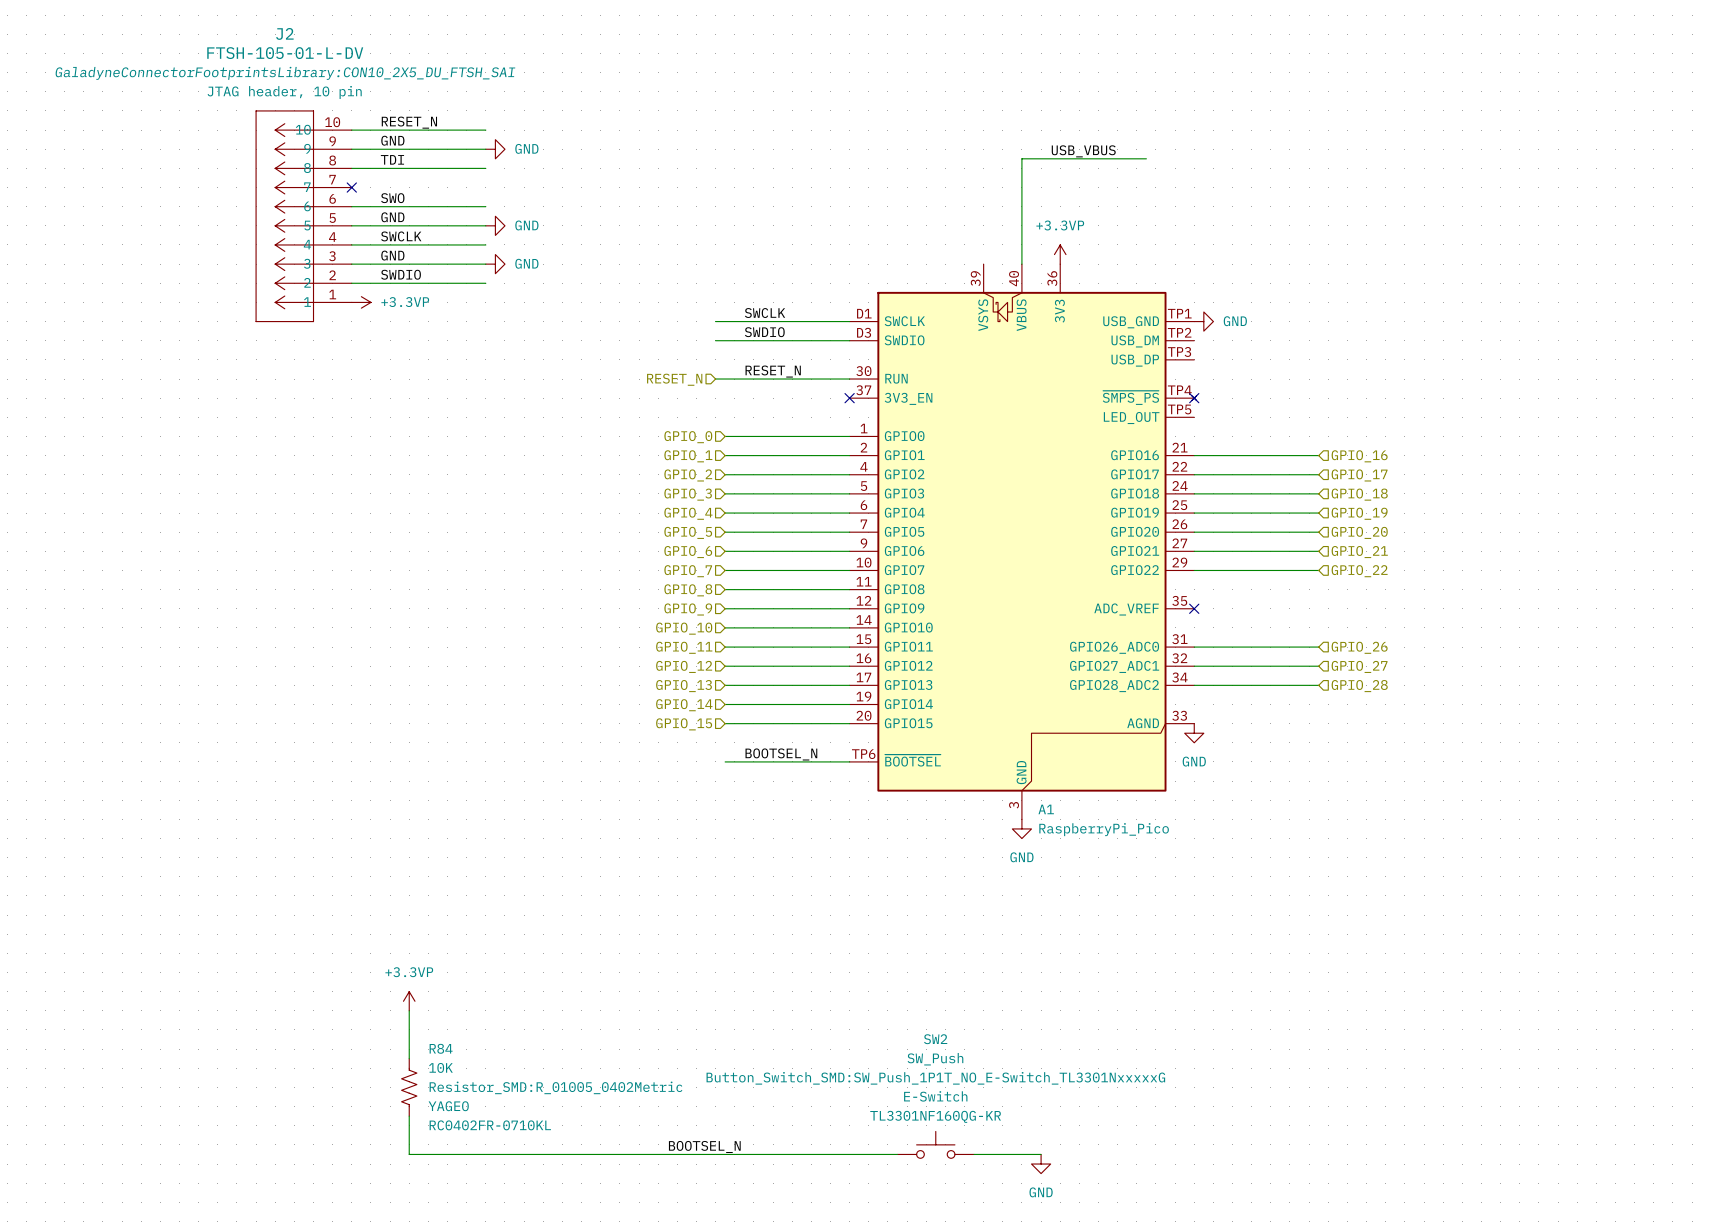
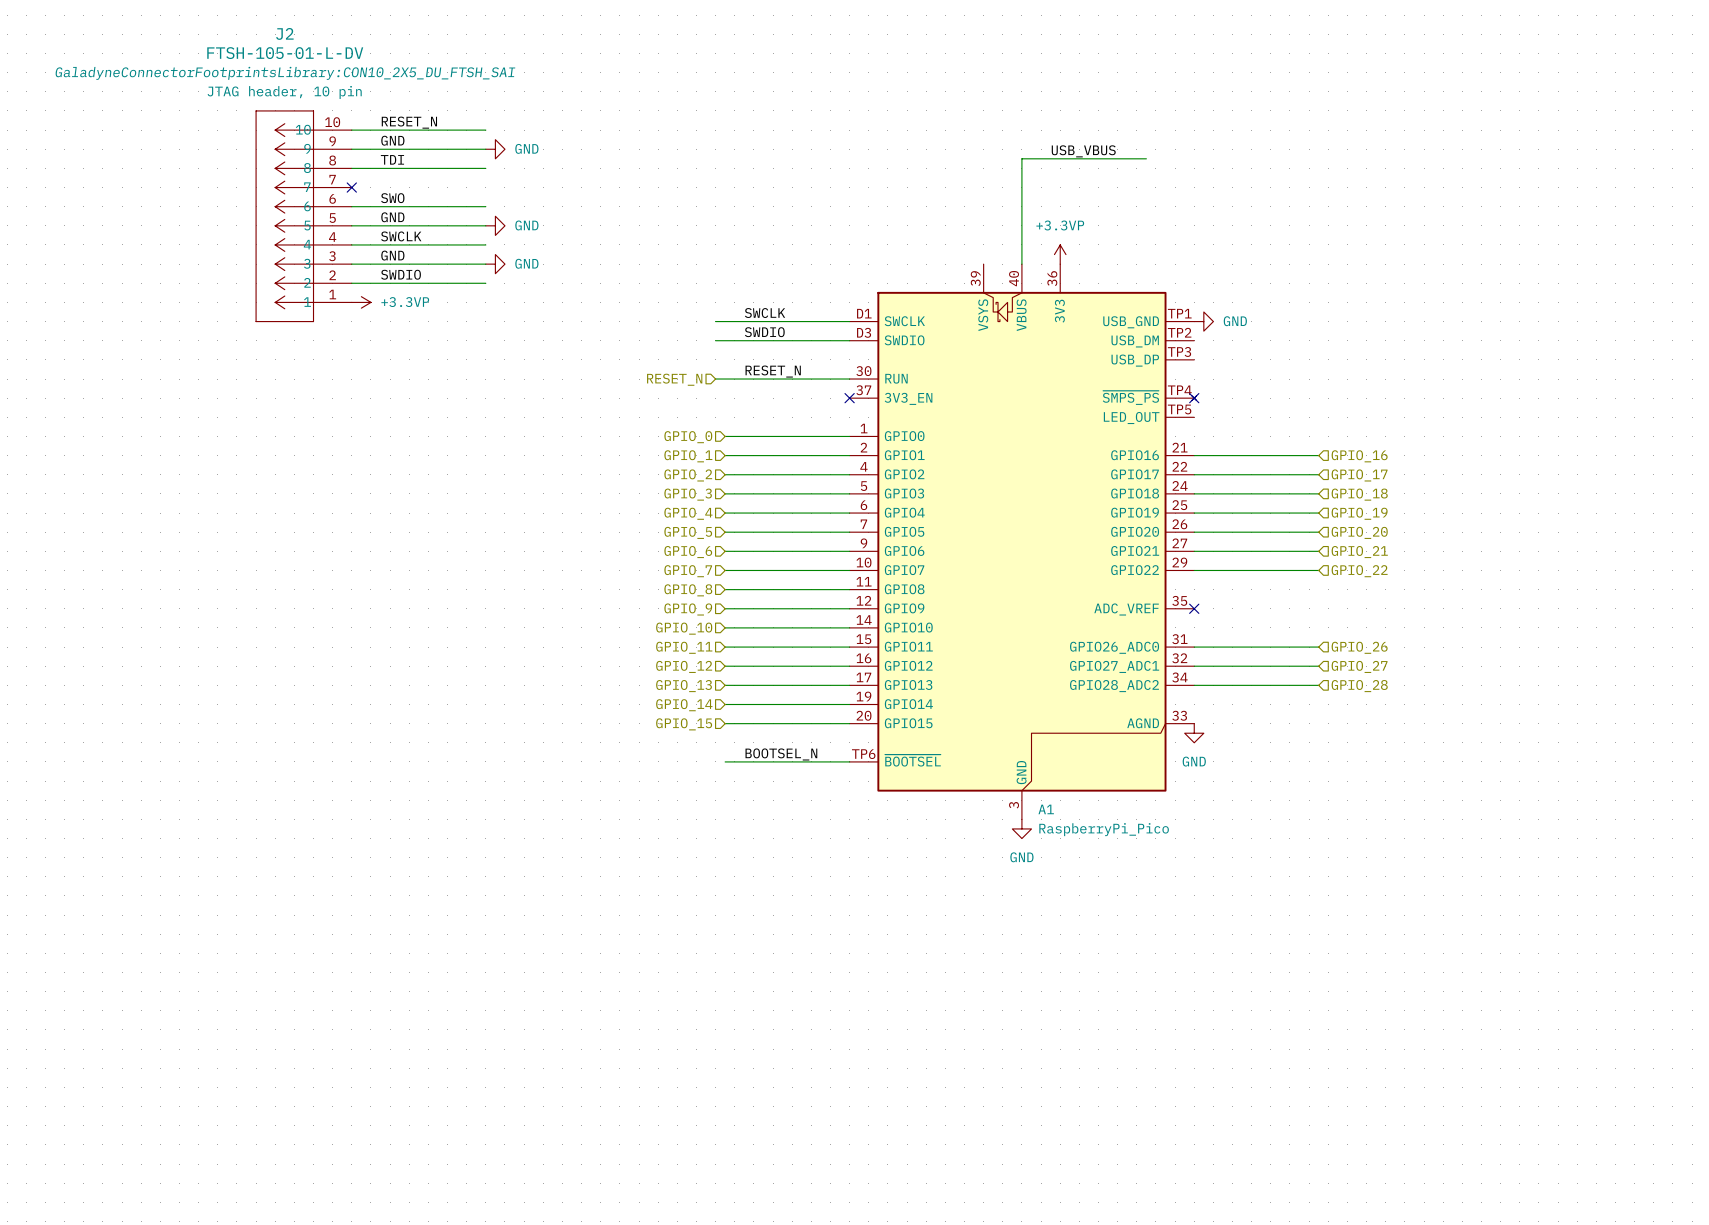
power symbol: +3.3VP (409, 1001) -> none
wire: (409, 1010) (409, 1058) -> none
R84: 10K (409, 1087) -> none
wire: (409, 1116) (409, 1154) (897, 1154) -> none
SW2: SW_Push (935, 1144) -> none
label: BOOTSEL_N (704, 1146) -> none
wire: (974, 1154) (1041, 1154) -> none
power symbol: GND (1041, 1164) -> none

